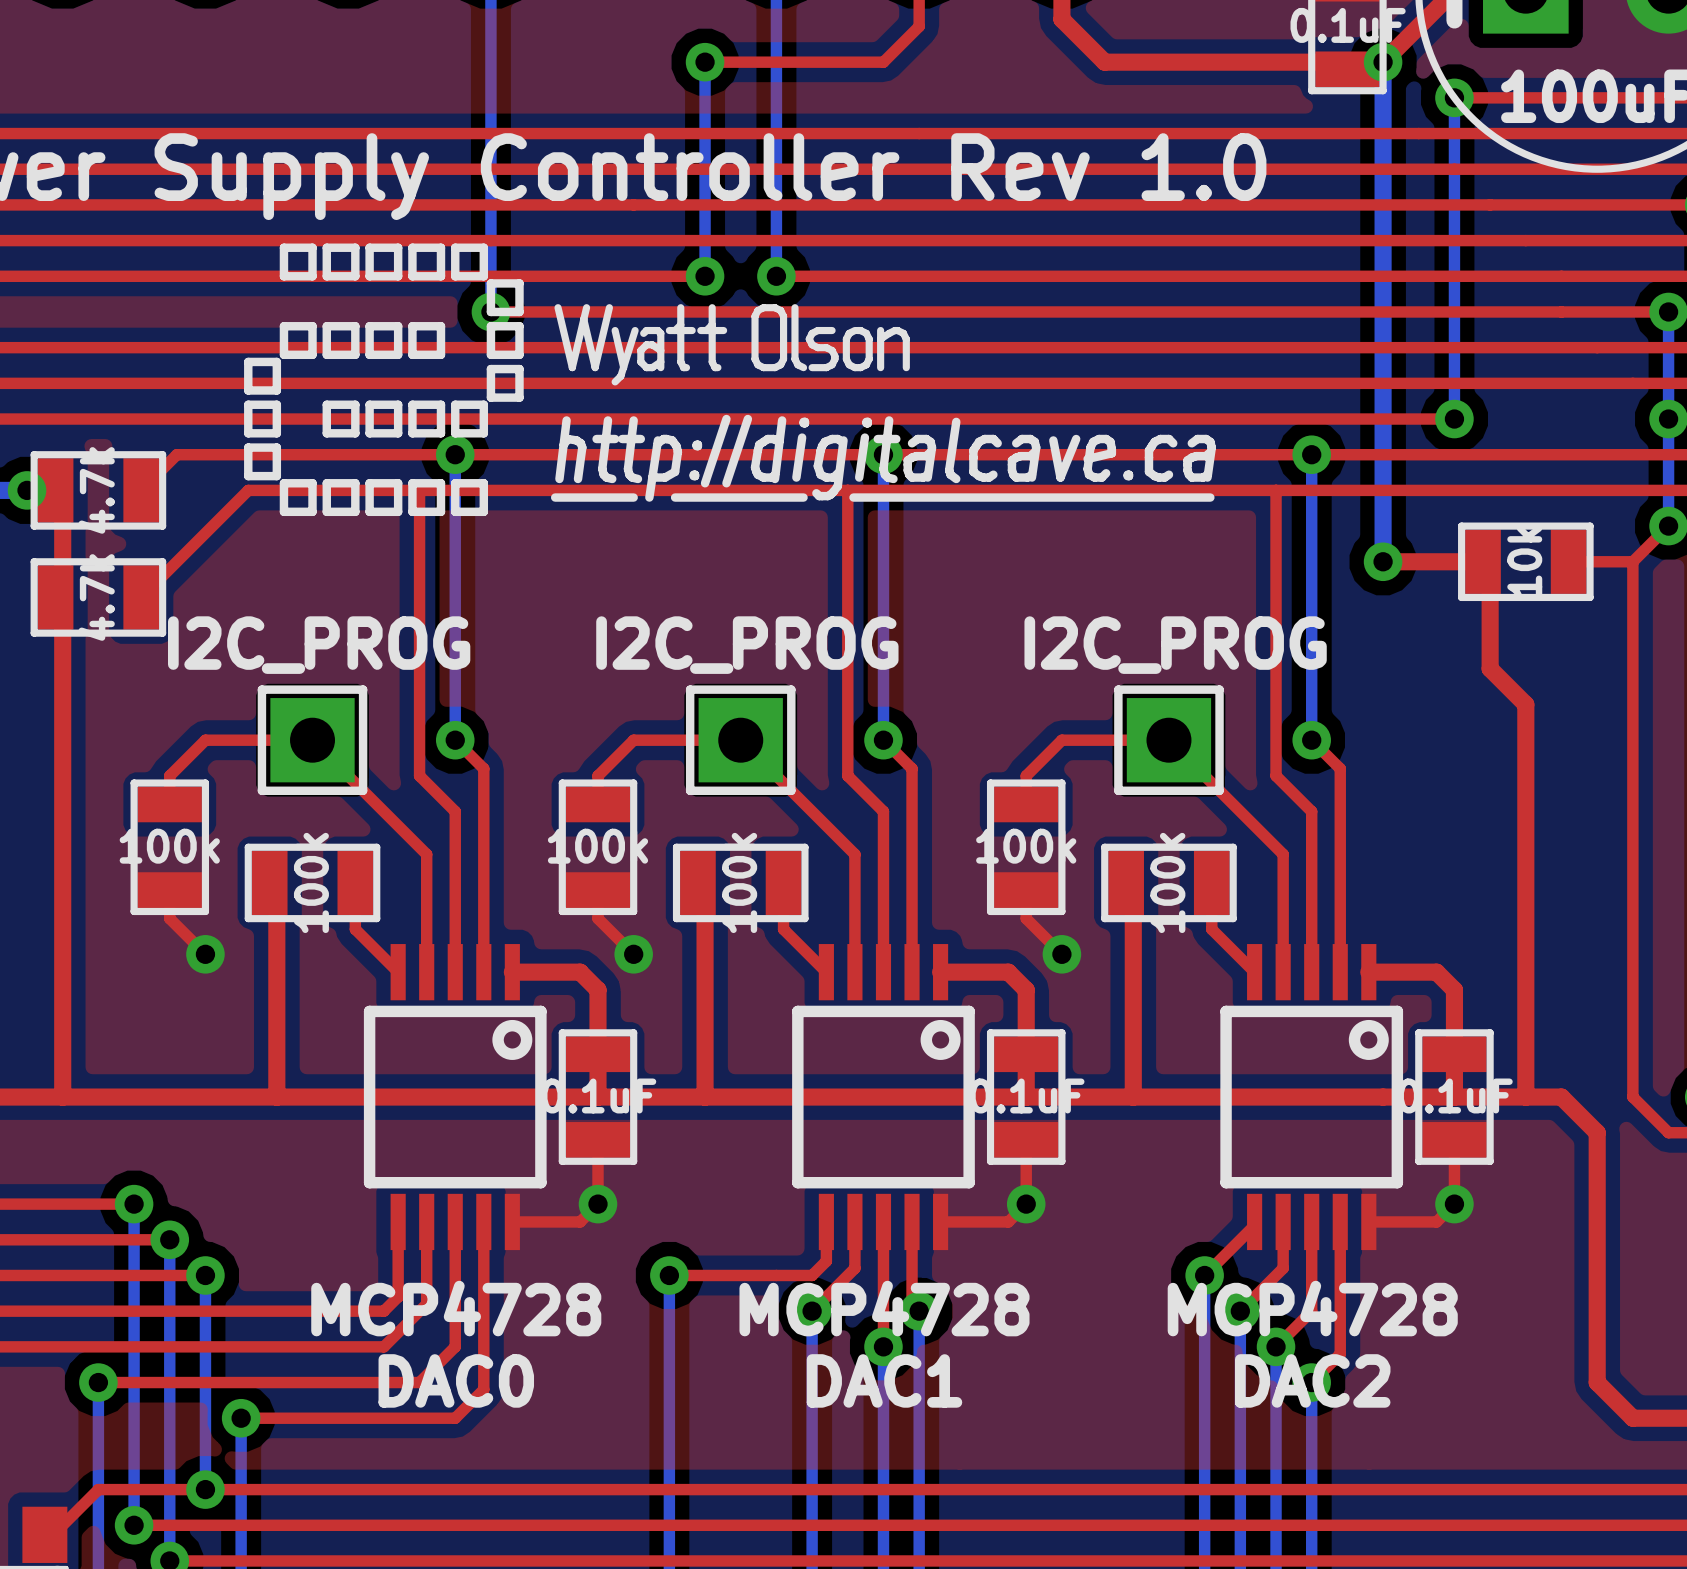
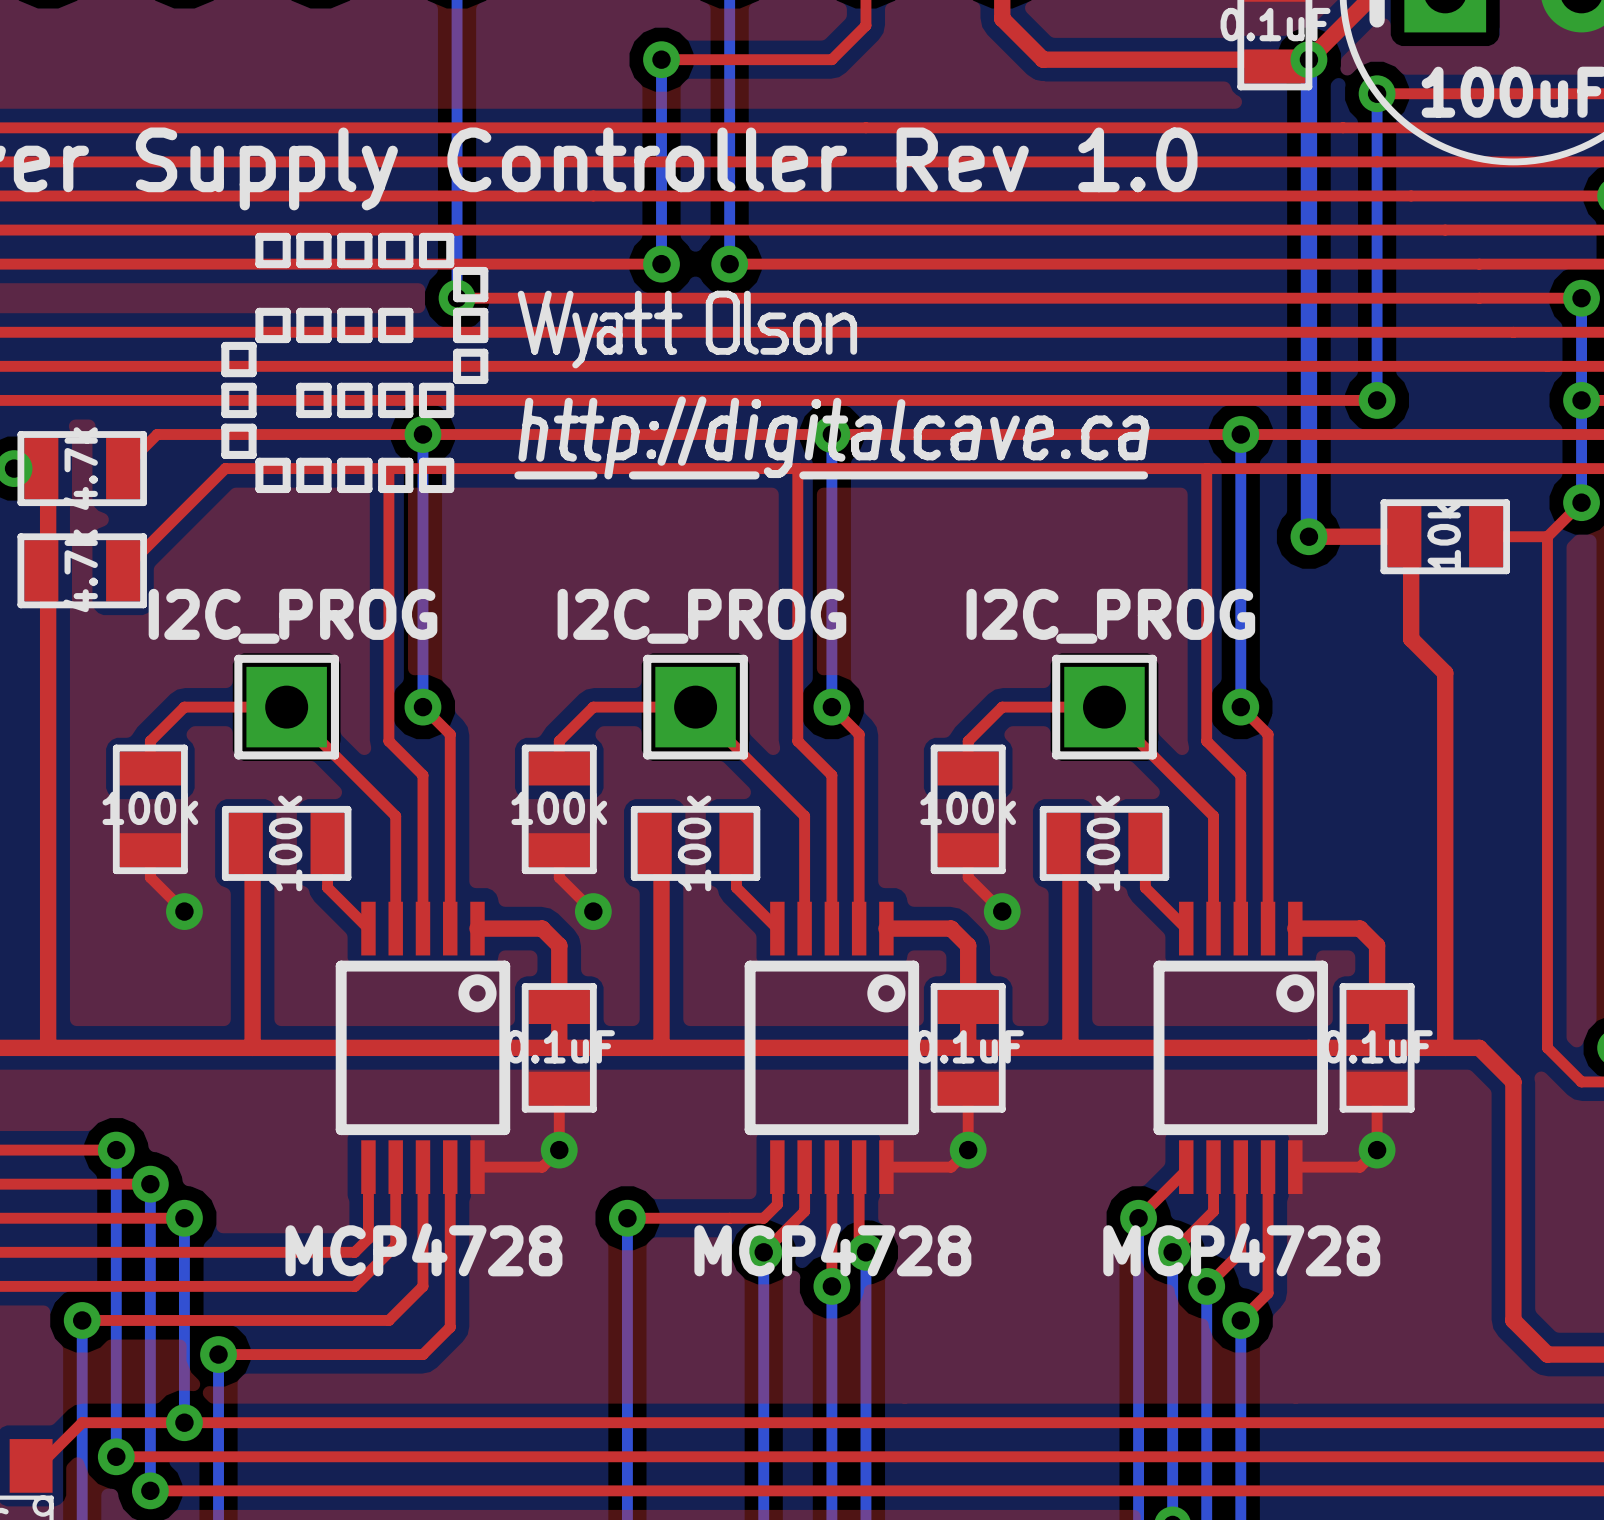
part text: DAC0 (456, 1380) -> none
part text: DAC1 (884, 1380) -> none
part text: DAC2 (1312, 1380) -> none

